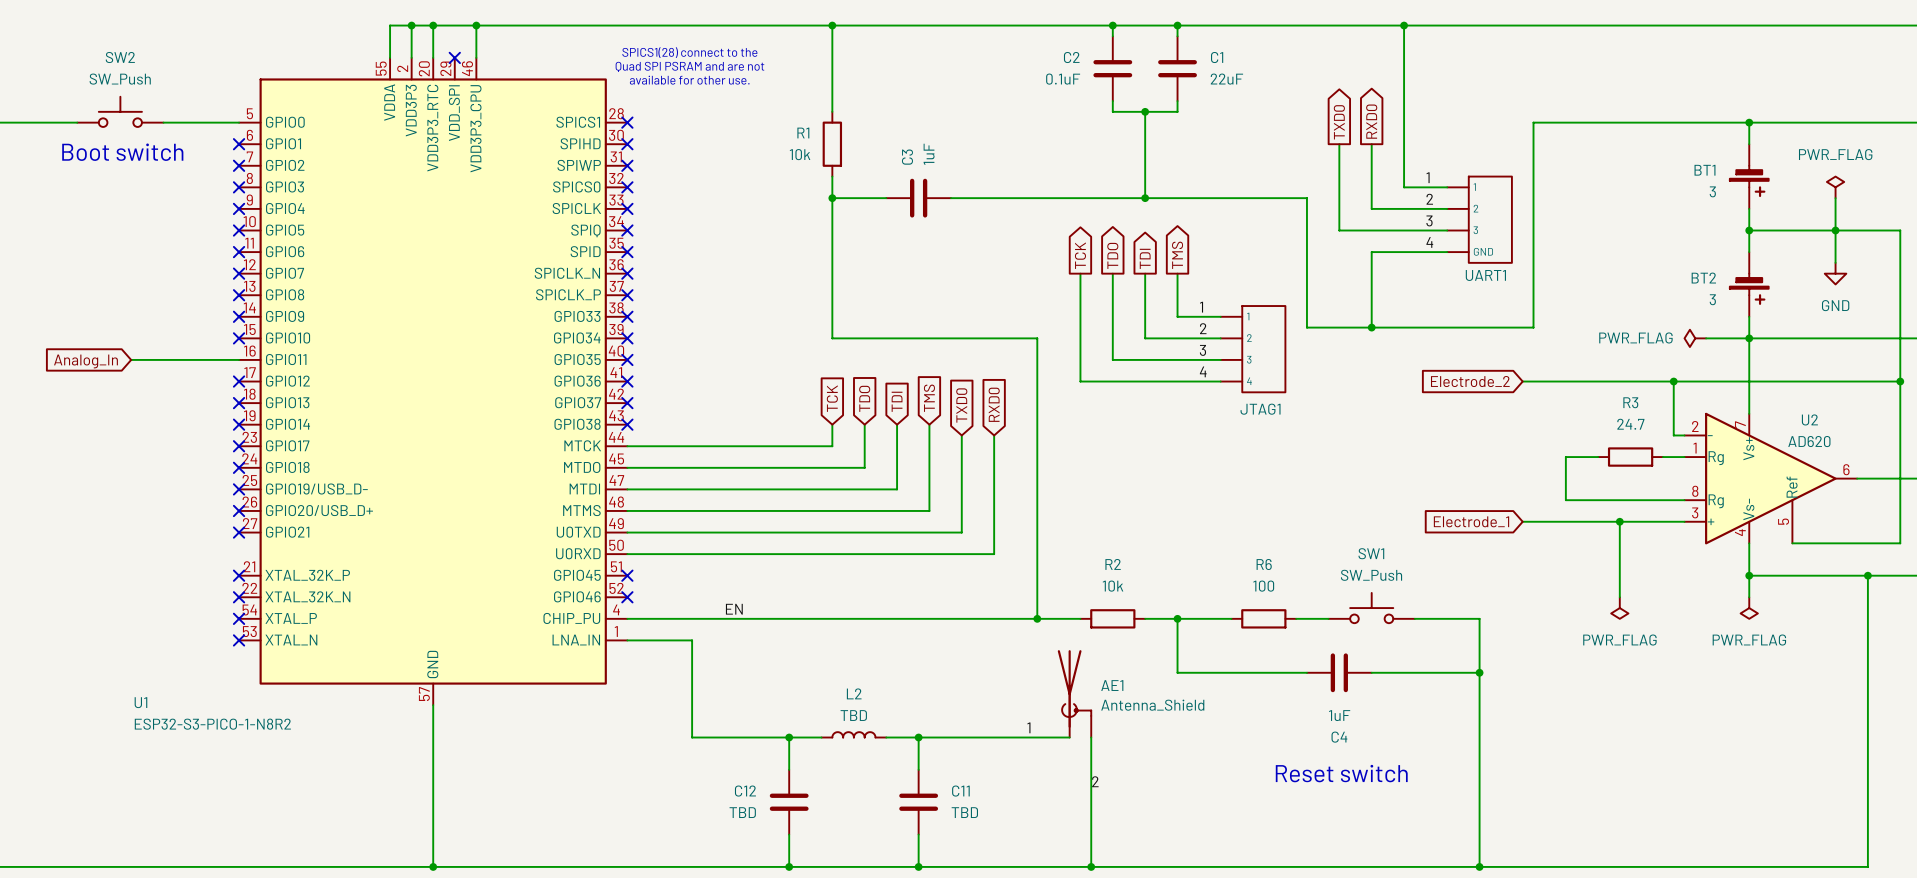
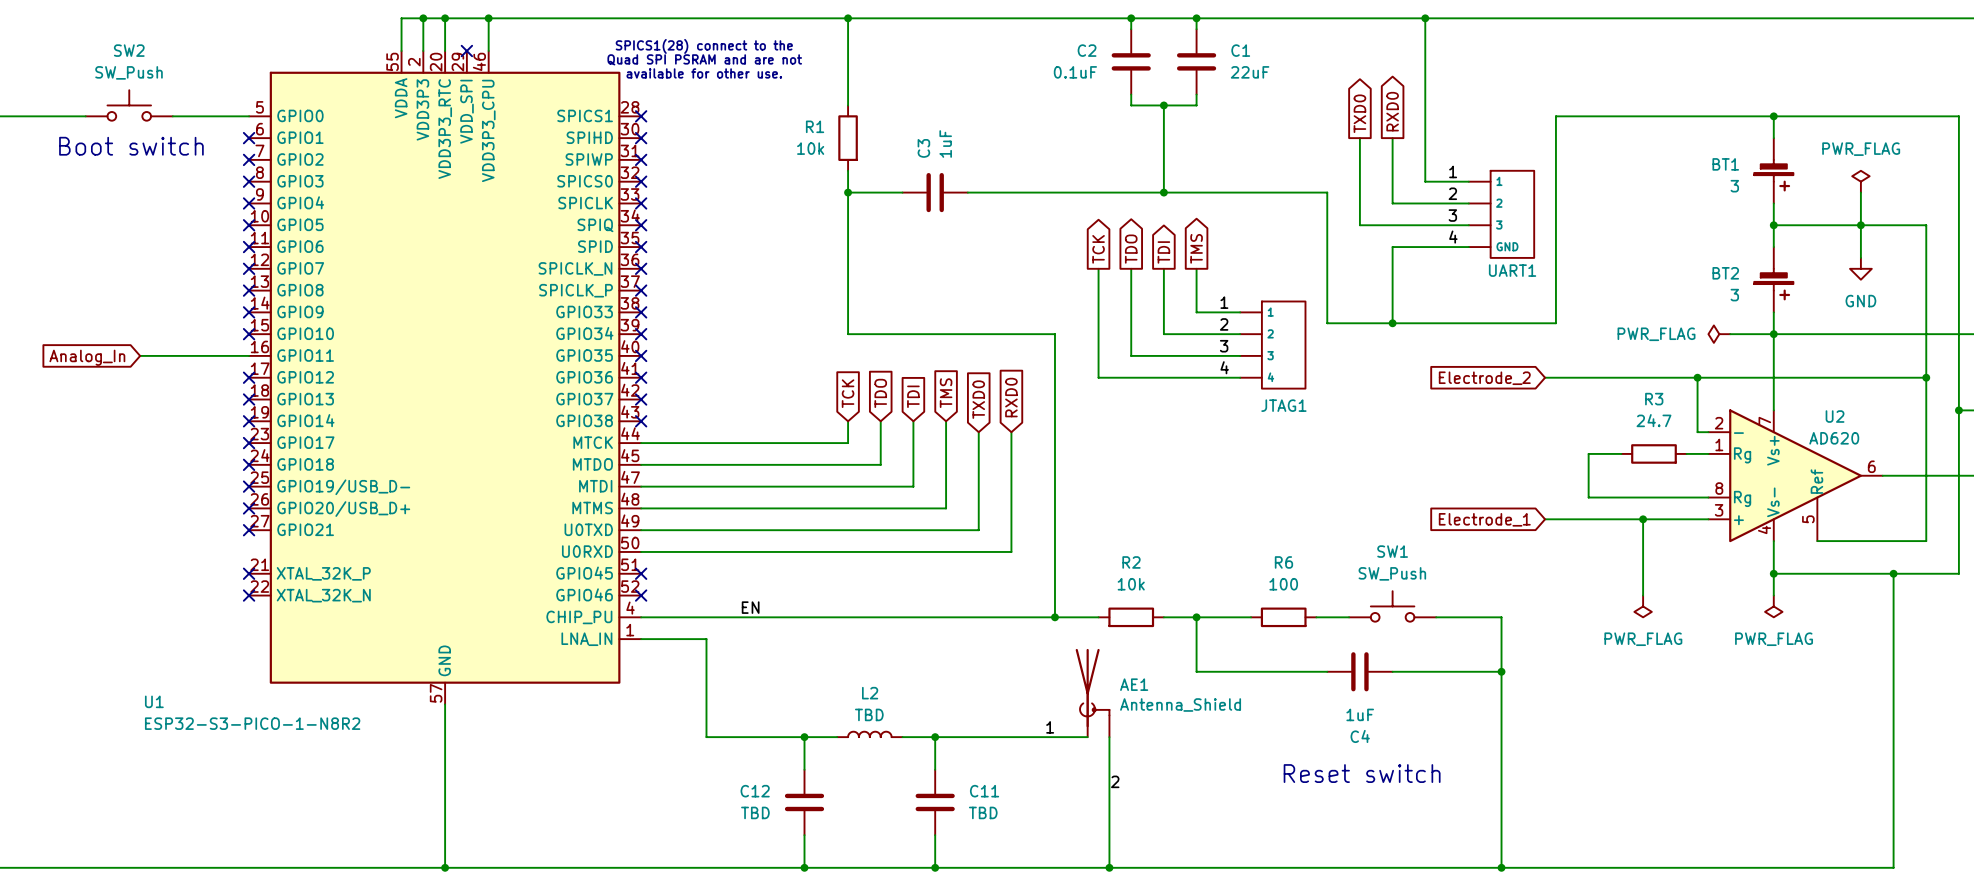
U1 symbol: [239, 57, 628, 706] -> [249, 51, 642, 705]
no-connect mark: (239, 618) -> none
no-connect mark: (239, 640) -> none

